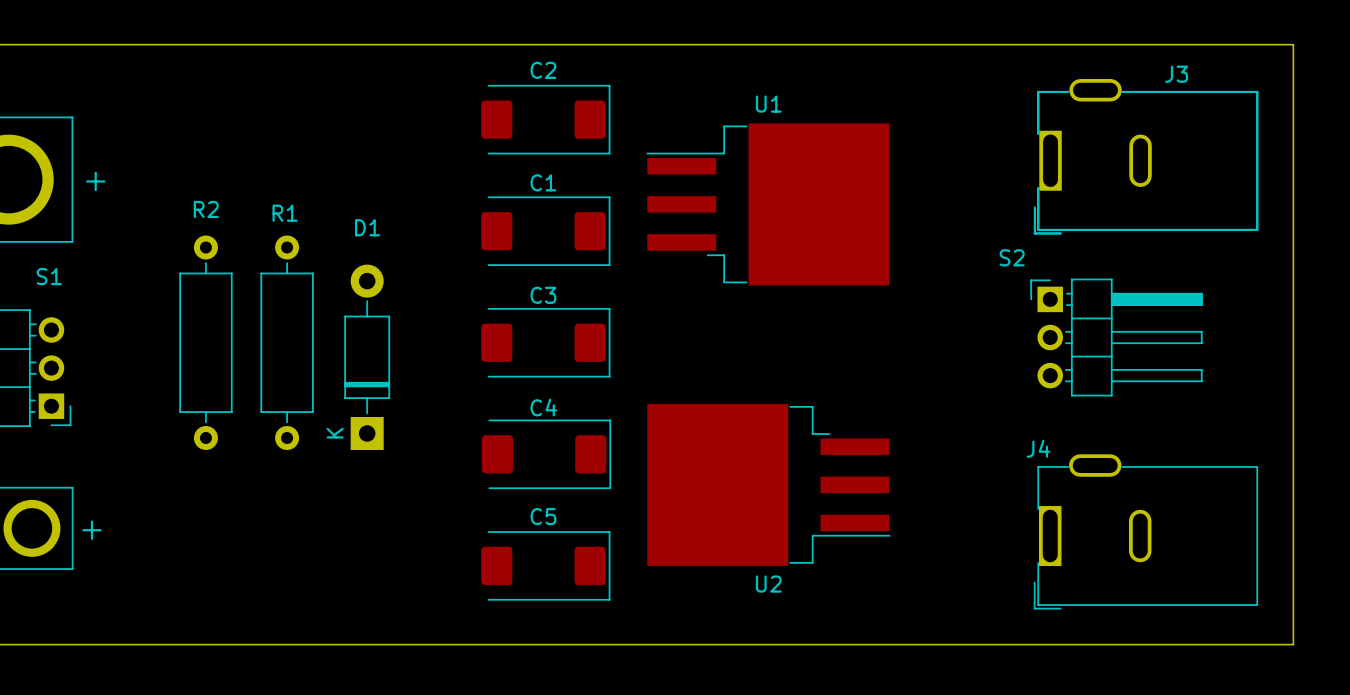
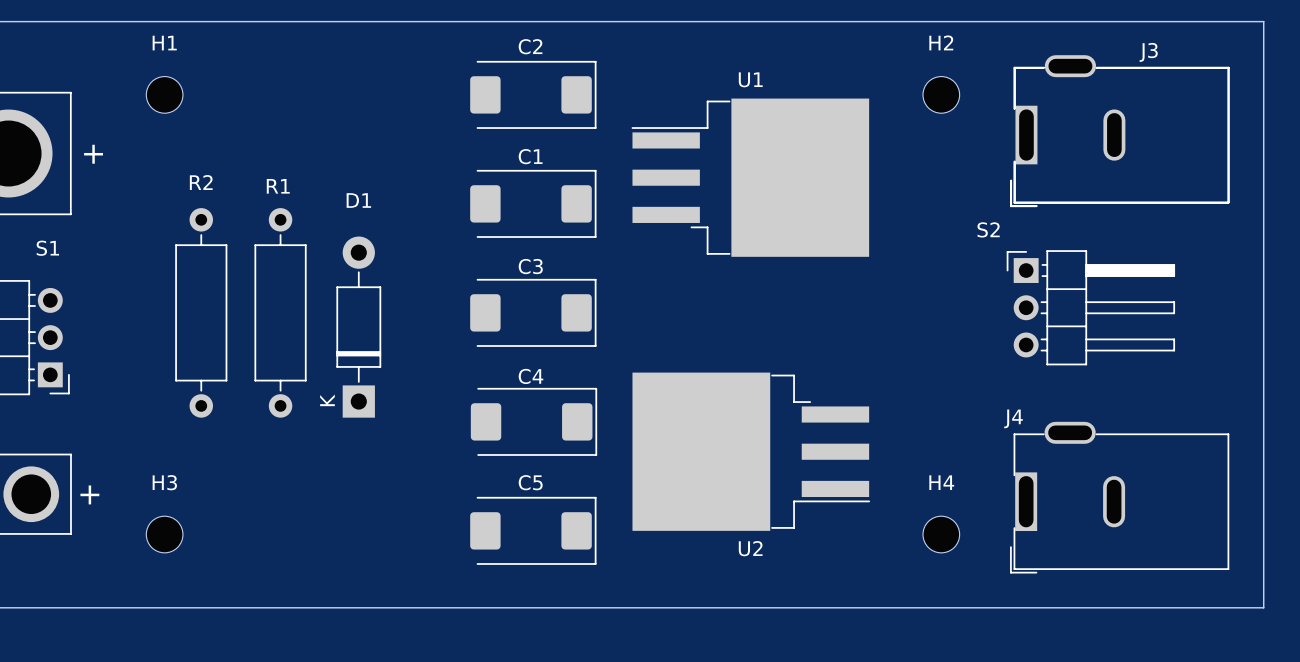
H1: none -> (164, 94)
H2: none -> (941, 94)
H3: none -> (164, 534)
H4: none -> (941, 534)

